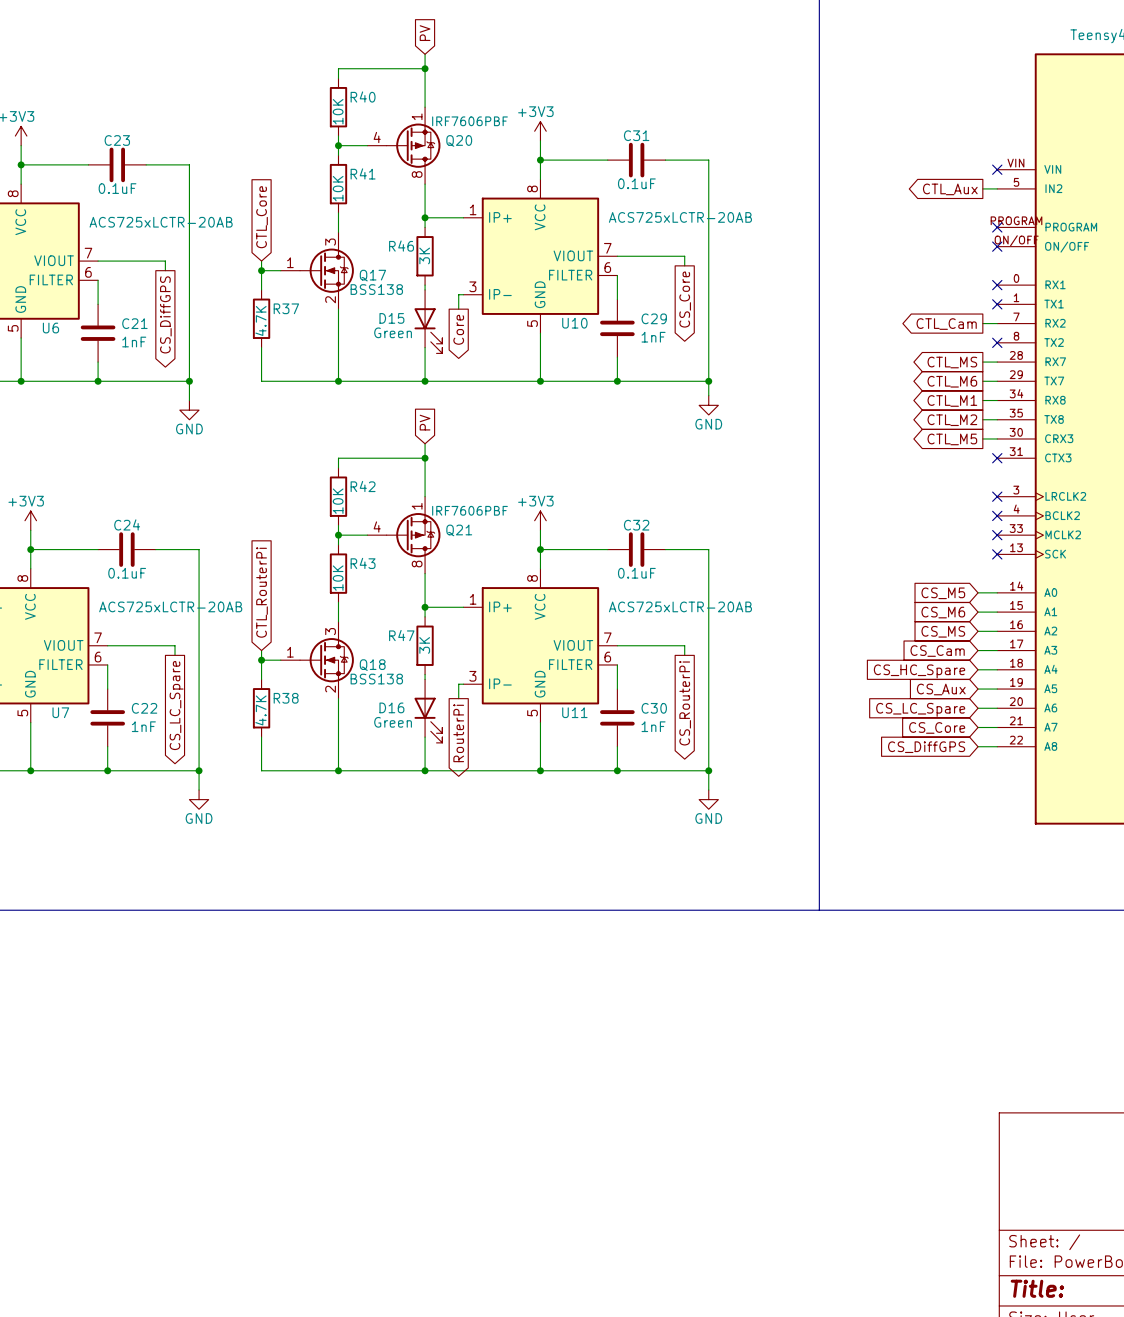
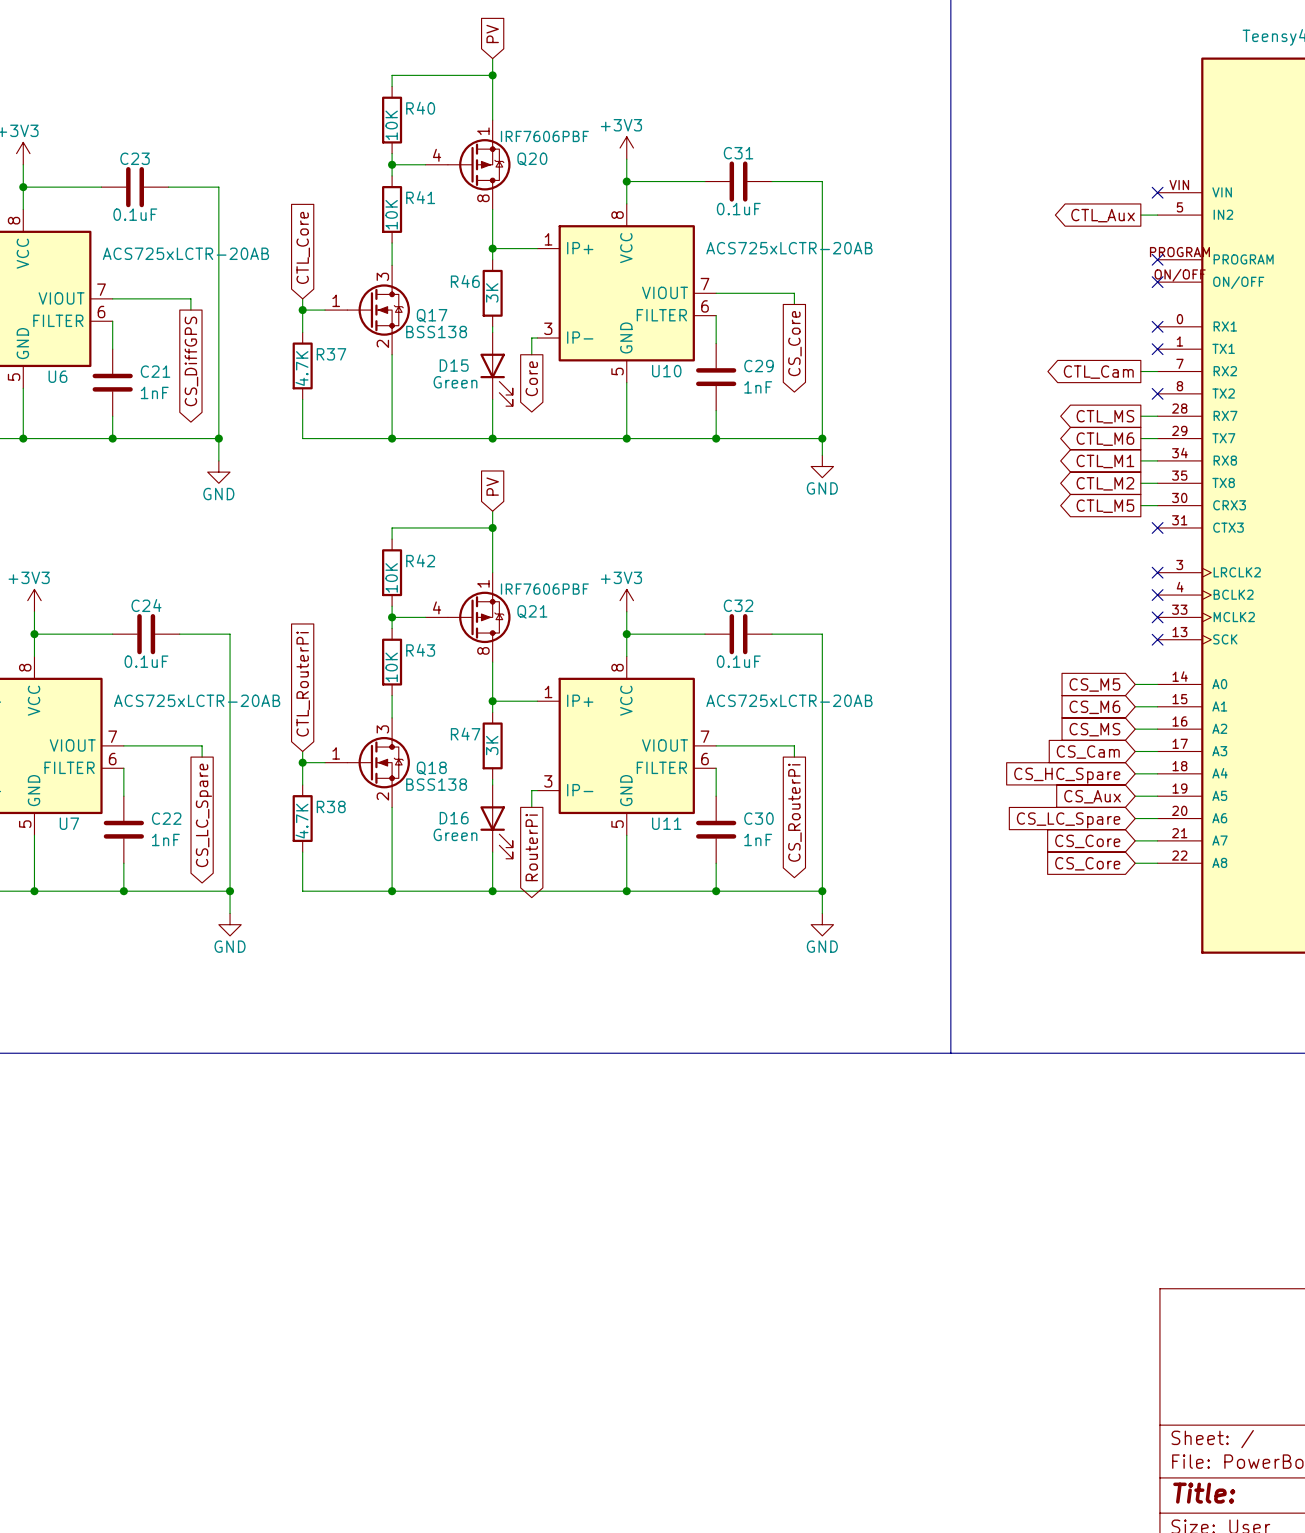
global label: CS_DiffGPS (926, 747) -> CS_Core (1087, 863)

